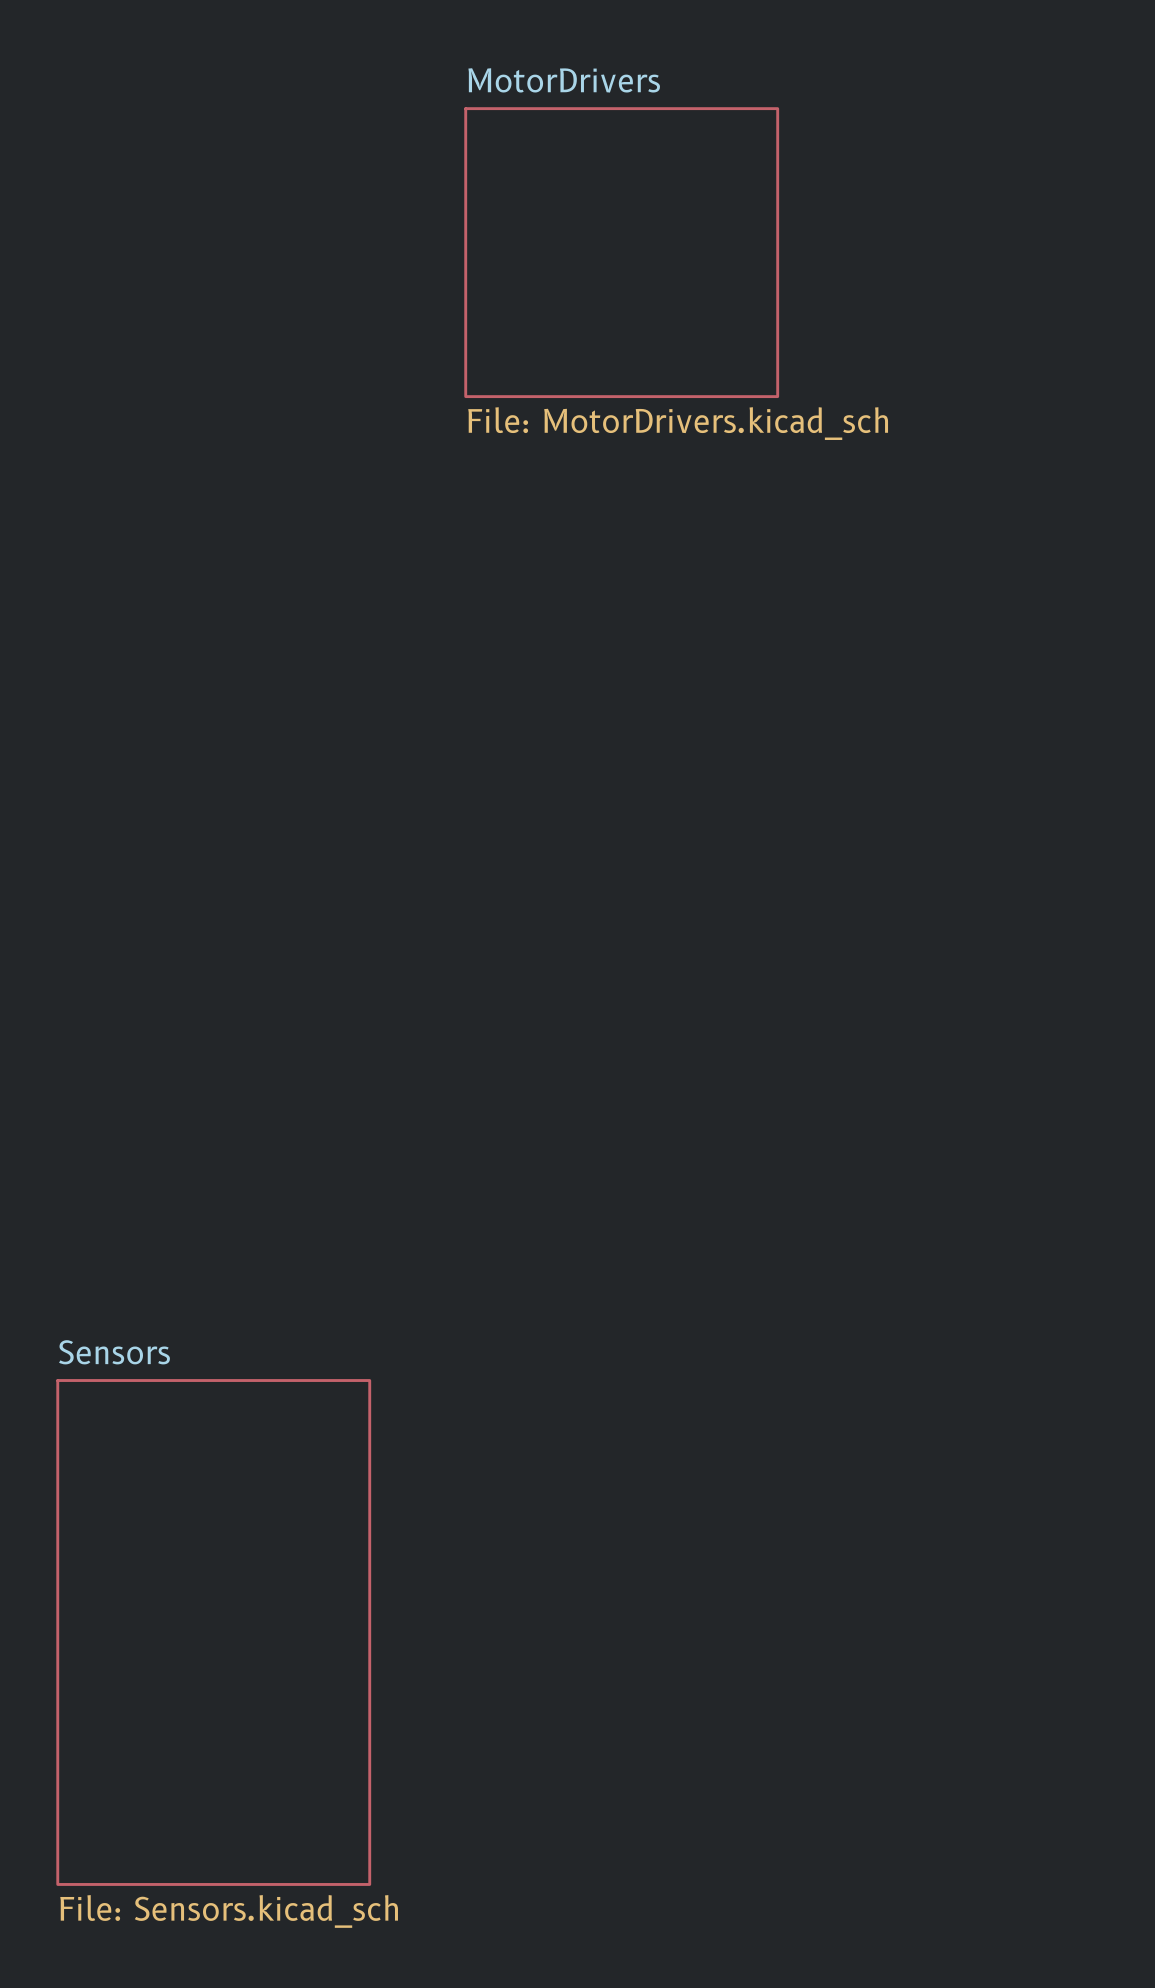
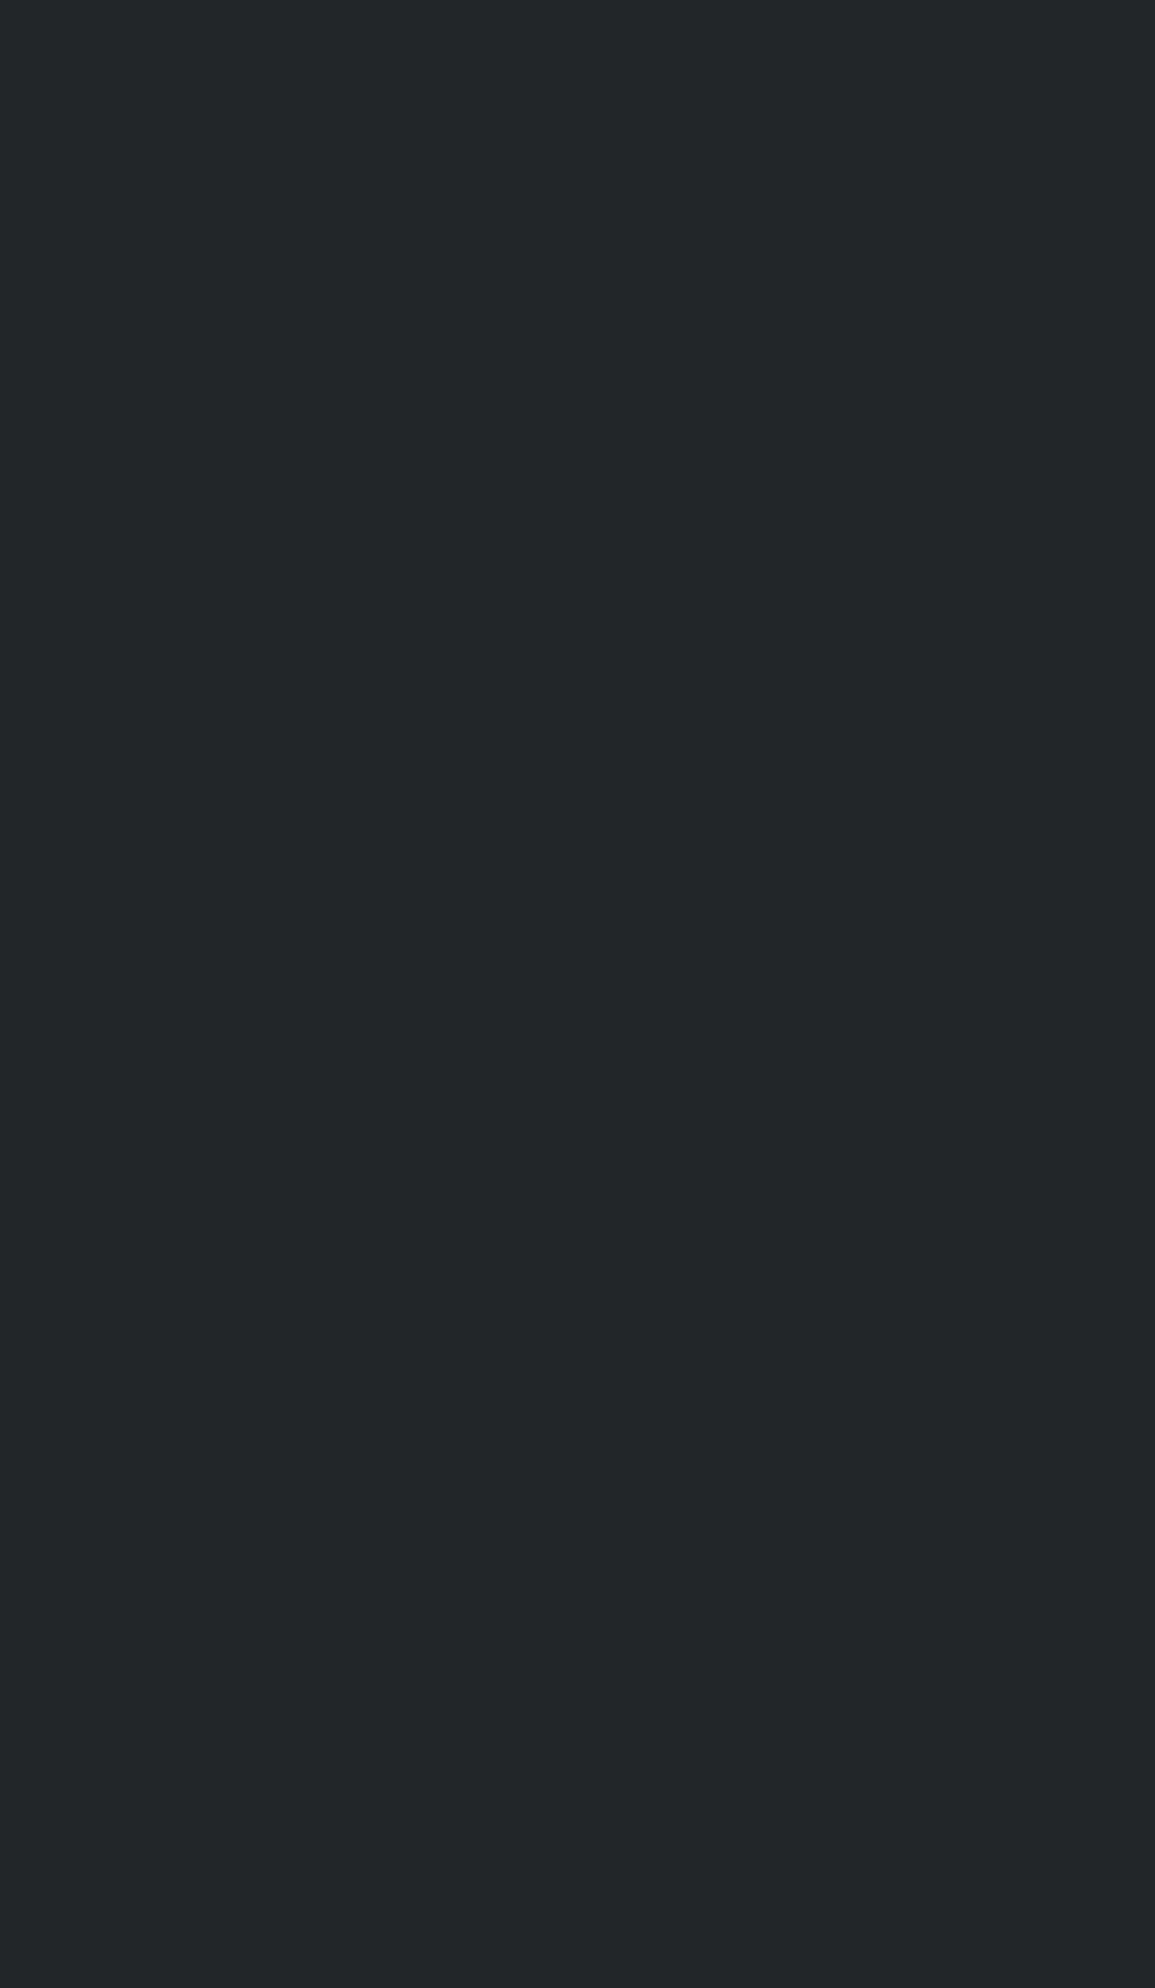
sheet MotorDrivers: File: MotorDrivers.kicad_sch (621, 252) -> none
sheet Sensors: File: Sensors.kicad_sch (213, 1632) -> none

